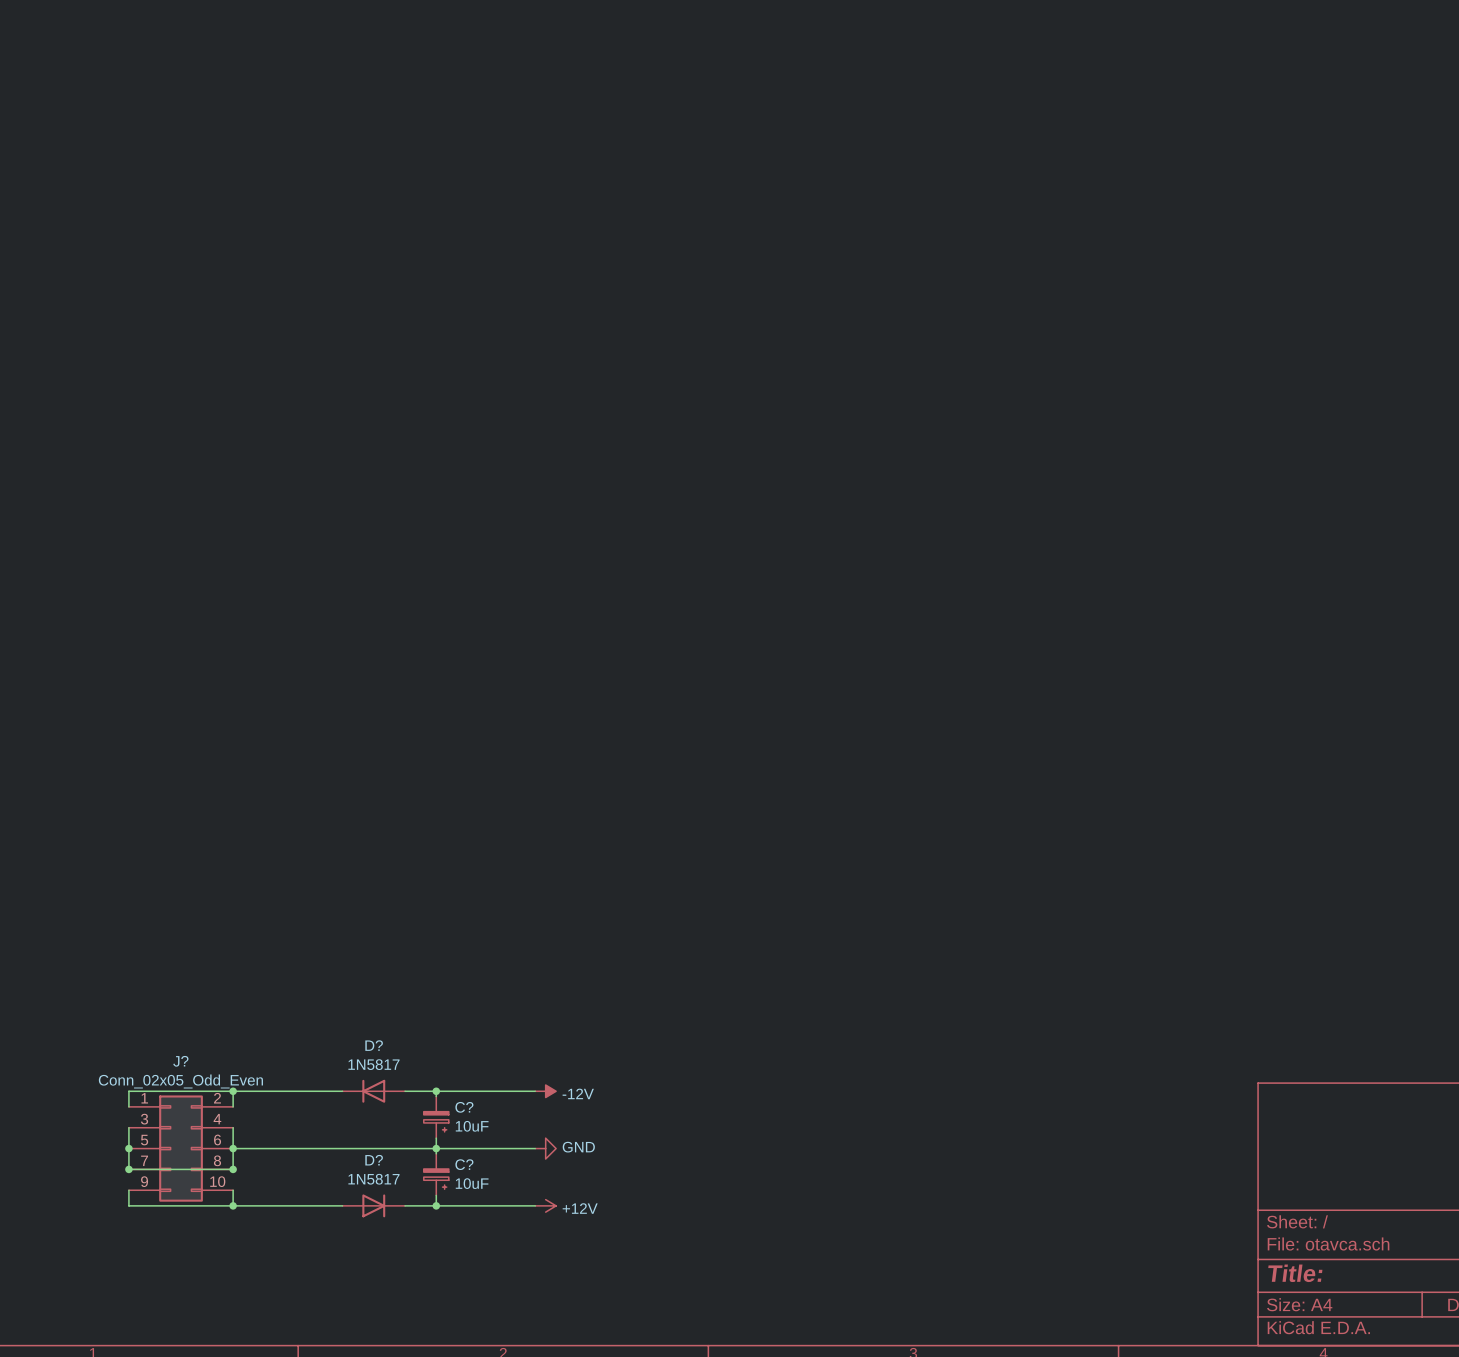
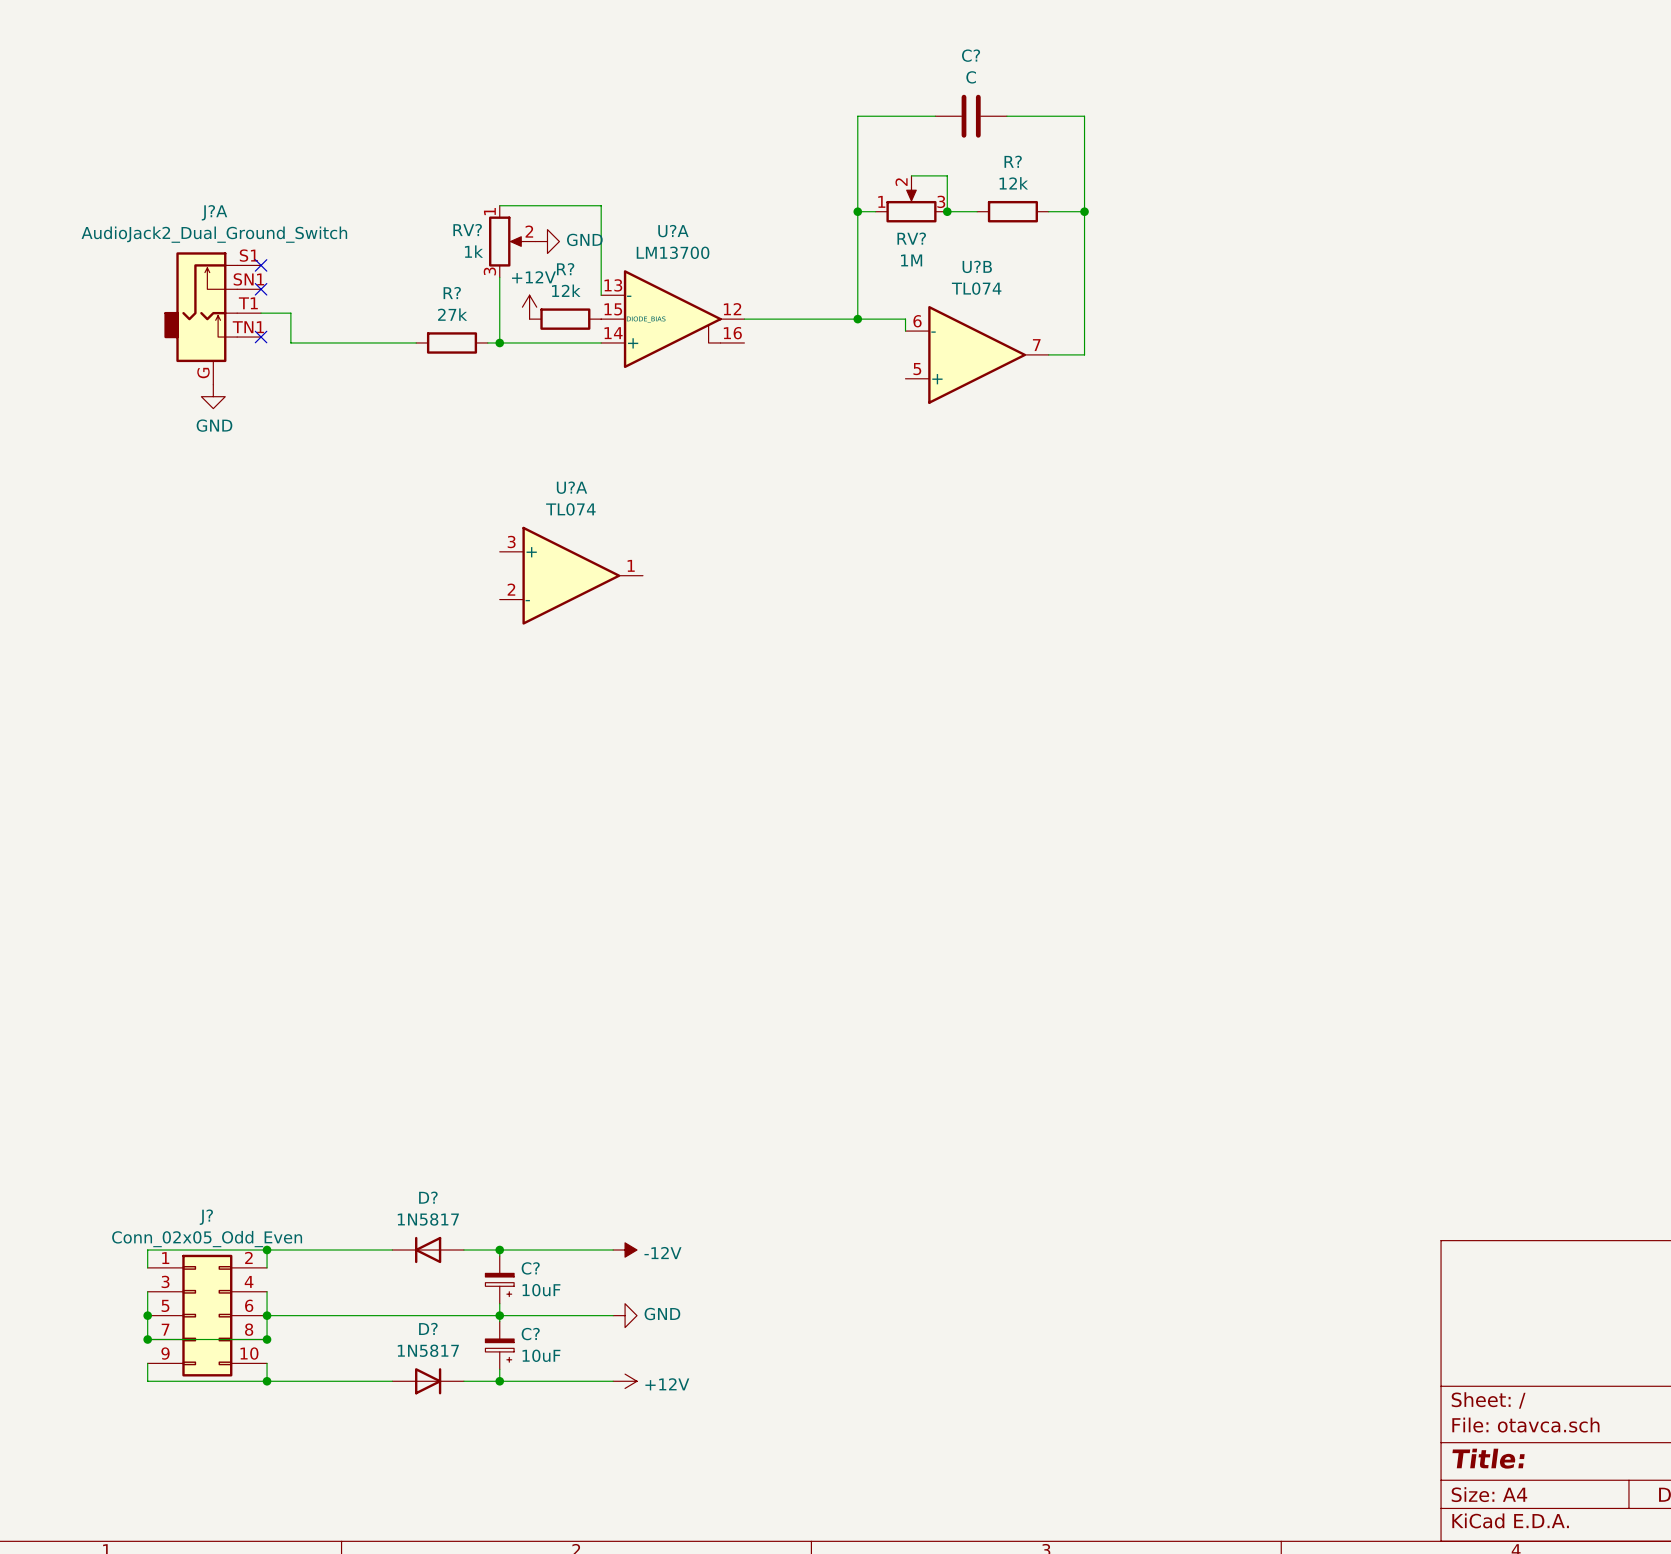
wire: none -> (935, 116) (857, 116) (857, 319)
C?: none -> C (971, 116)
wire: none -> (1006, 116) (1084, 116) (1084, 354) (1048, 354)
wire: none -> (911, 175) (947, 175) (947, 211) (977, 211)
RV?: none -> 1M (911, 199)
wire: none -> (499, 205) (601, 205) (601, 295)
wire: none -> (857, 211) (875, 211)
junction: none -> (857, 211)
junction: none -> (947, 211)
R?: none -> 12k (1012, 211)
wire: none -> (1048, 211) (1084, 211)
junction: none -> (1084, 211)
RV?: none -> 1k (512, 241)
power symbol: none -> GND (547, 241)
no-connect mark: none -> (261, 265)
wire: none -> (499, 277) (499, 342)
no-connect mark: none -> (261, 289)
power symbol: none -> +12V (529, 307)
wire: none -> (261, 313) (290, 313) (290, 342) (416, 342)
J?A: none -> AudioJack2_Dual_Ground_Switch (212, 318)
R?: none -> 12k (565, 319)
U?A: none -> LM13700 (672, 319)
wire: none -> (744, 319) (905, 319) (905, 331)
junction: none -> (857, 319)
no-connect mark: none -> (261, 337)
R?: none -> 27k (452, 342)
wire: none -> (487, 342) (601, 342)
junction: none -> (499, 342)
U?B: none -> TL074 (977, 354)
power symbol: none -> GND (213, 396)
U?A: none -> TL074 (571, 575)

